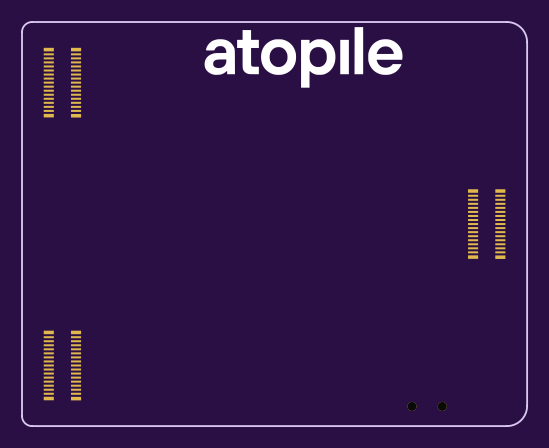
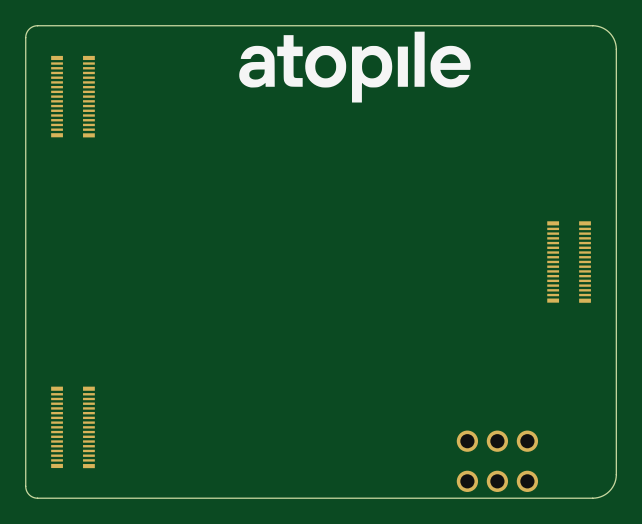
part: none -> (497, 461)
part: (427, 406) -> none

